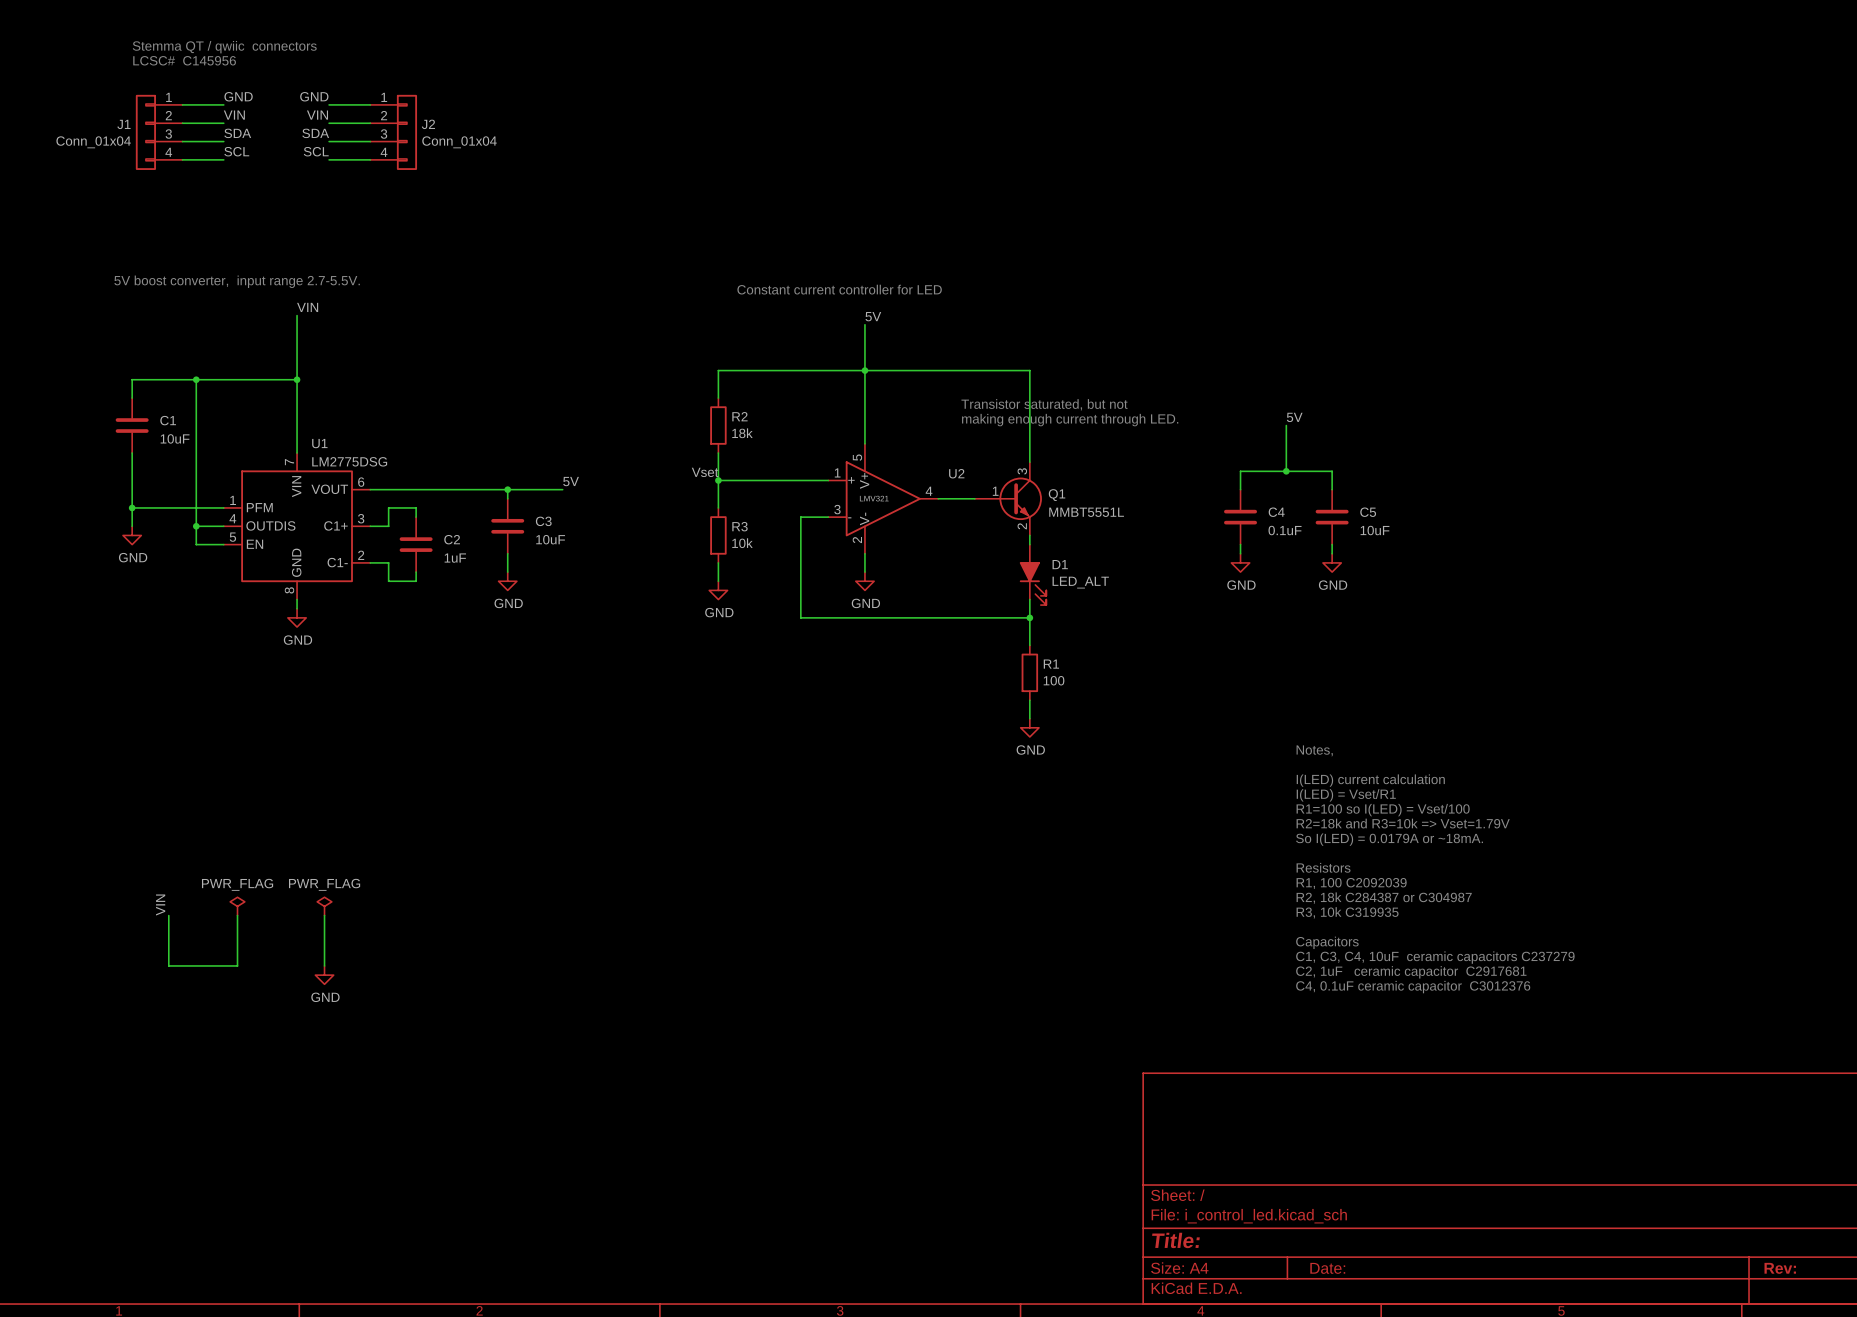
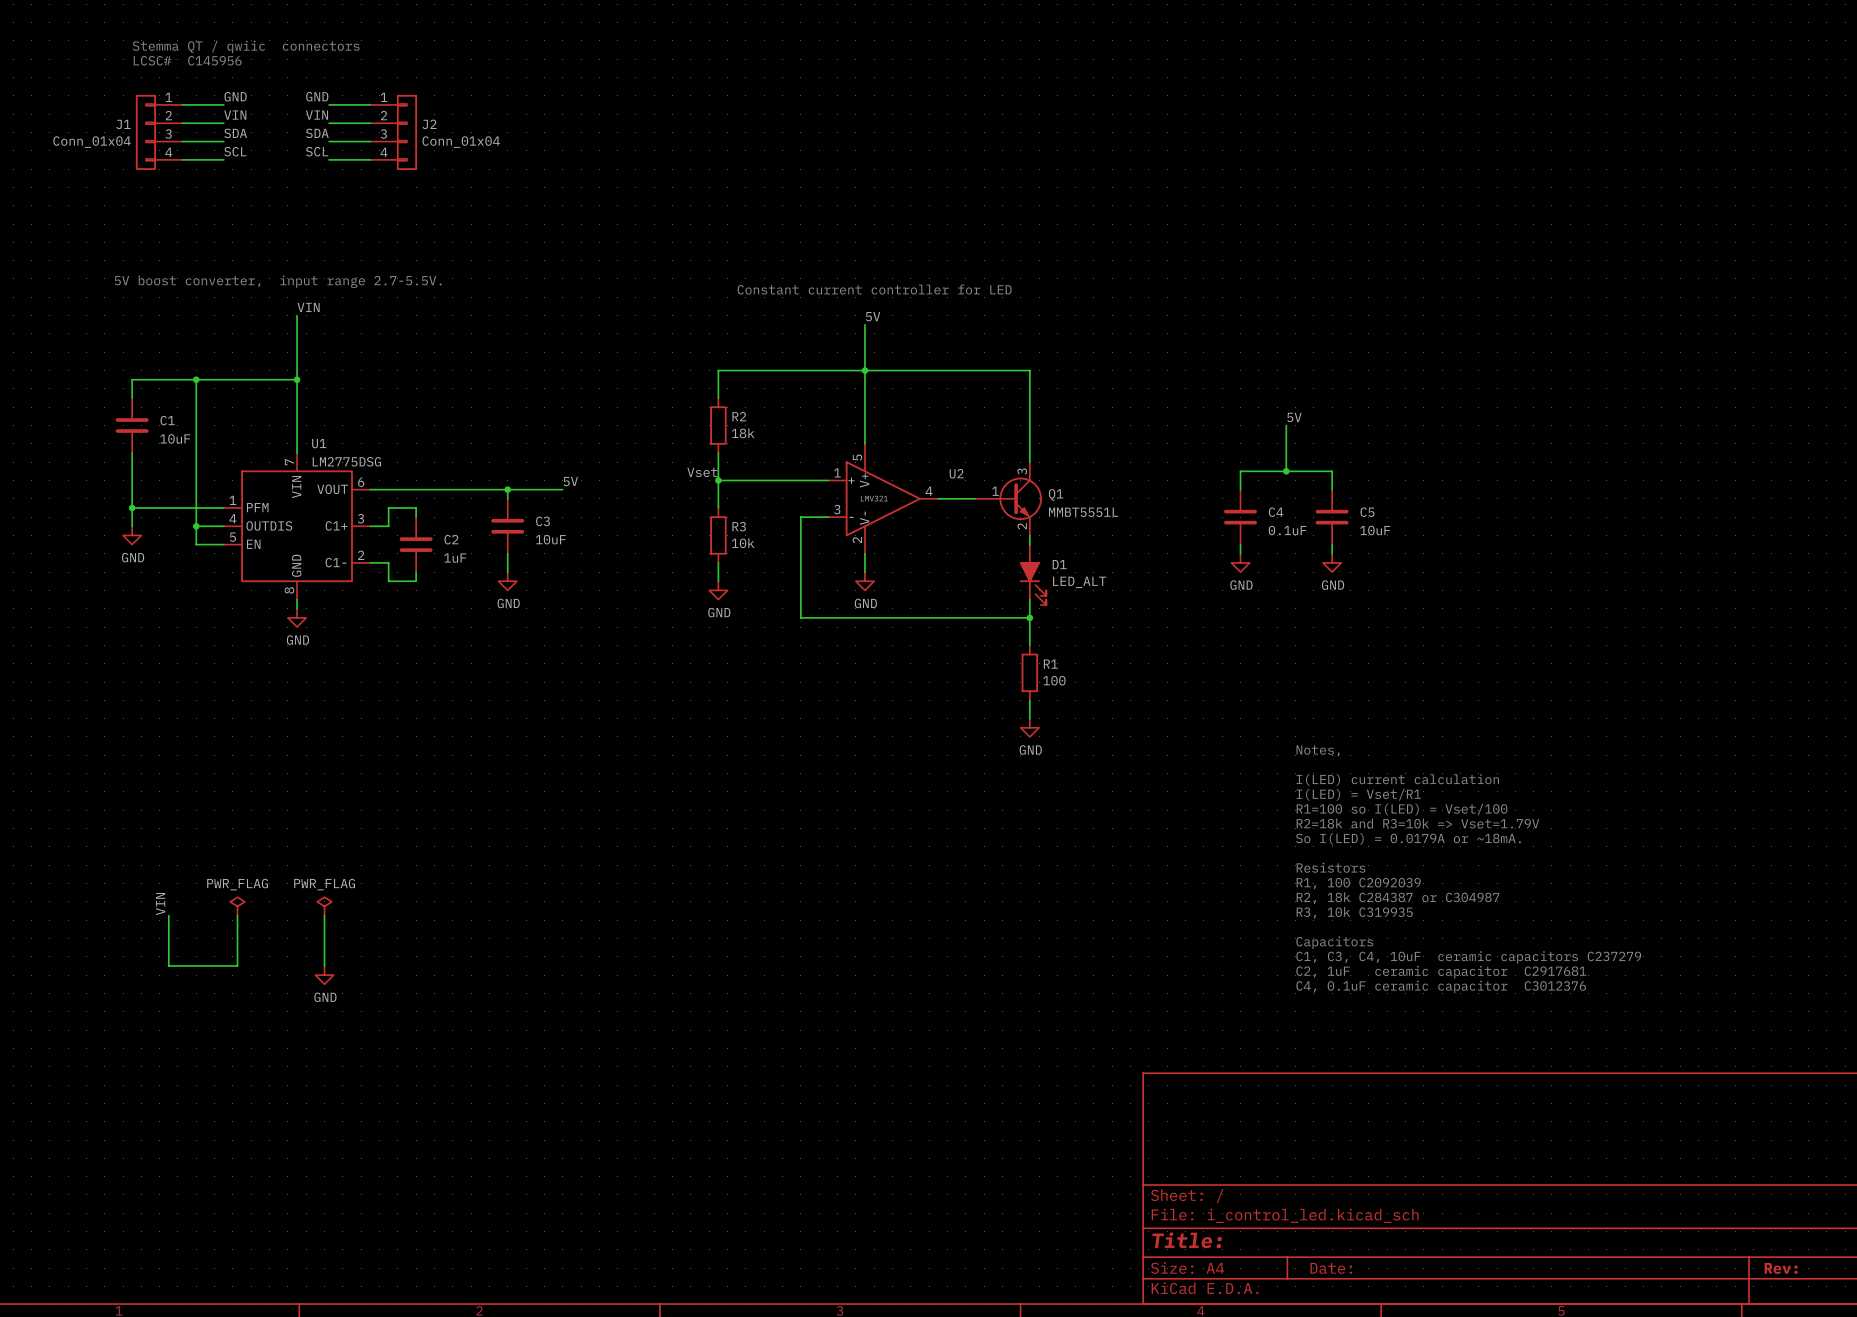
text: Transistor saturated, but not (1044, 404) -> none
text: making enough current through LED. (1070, 420) -> none

